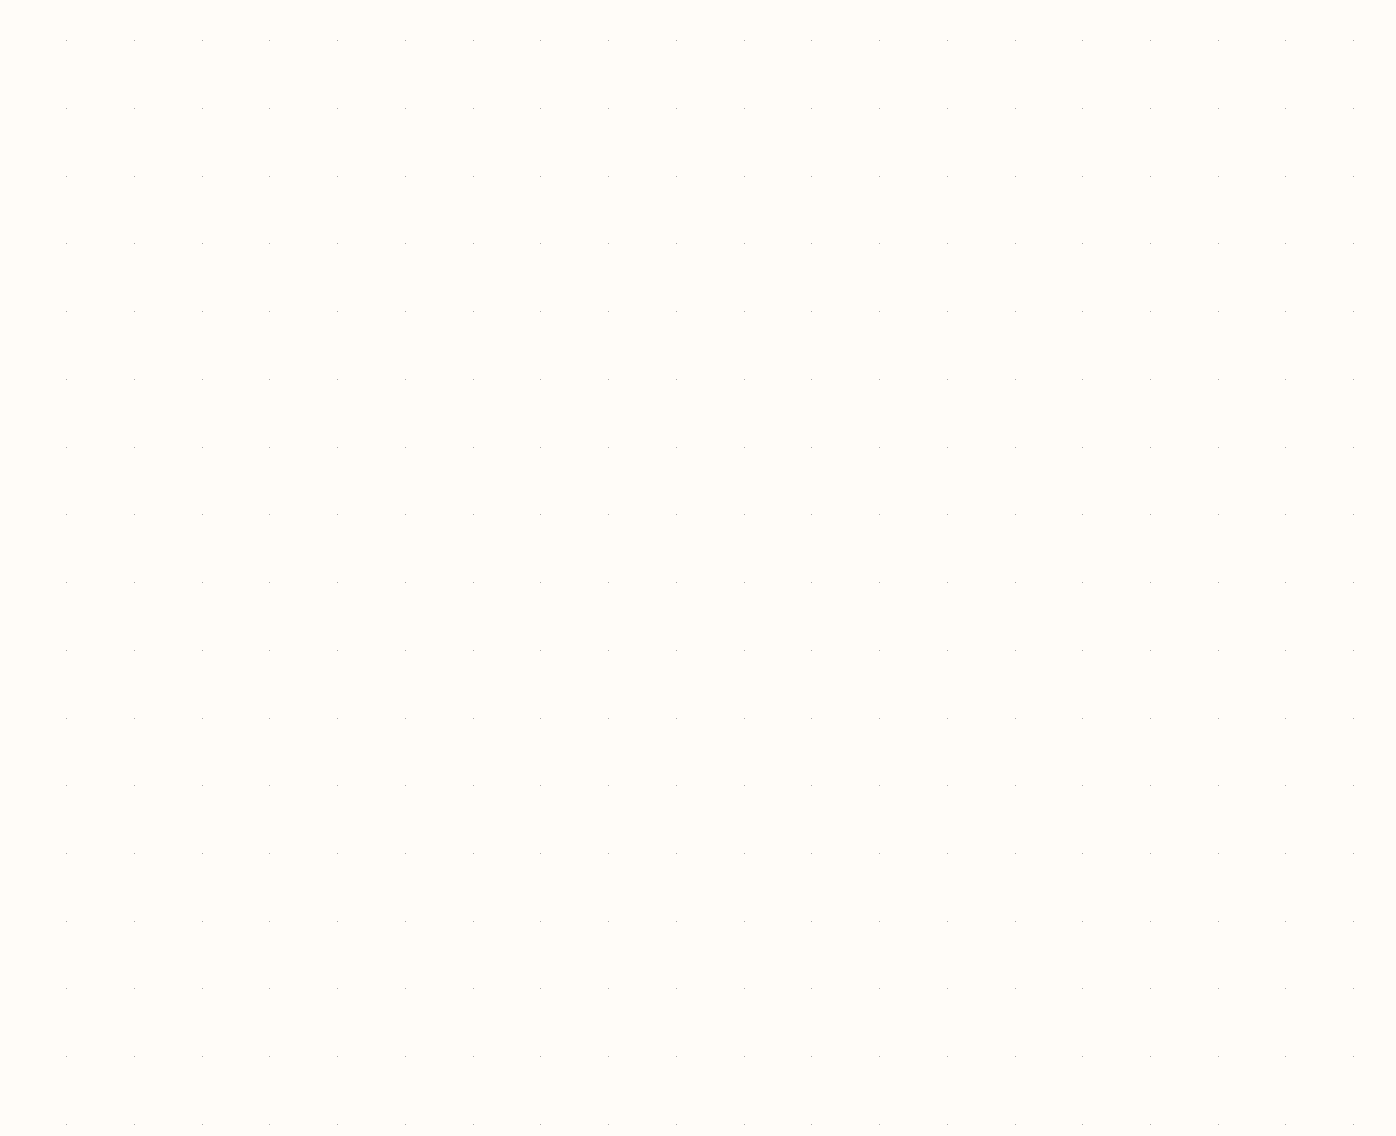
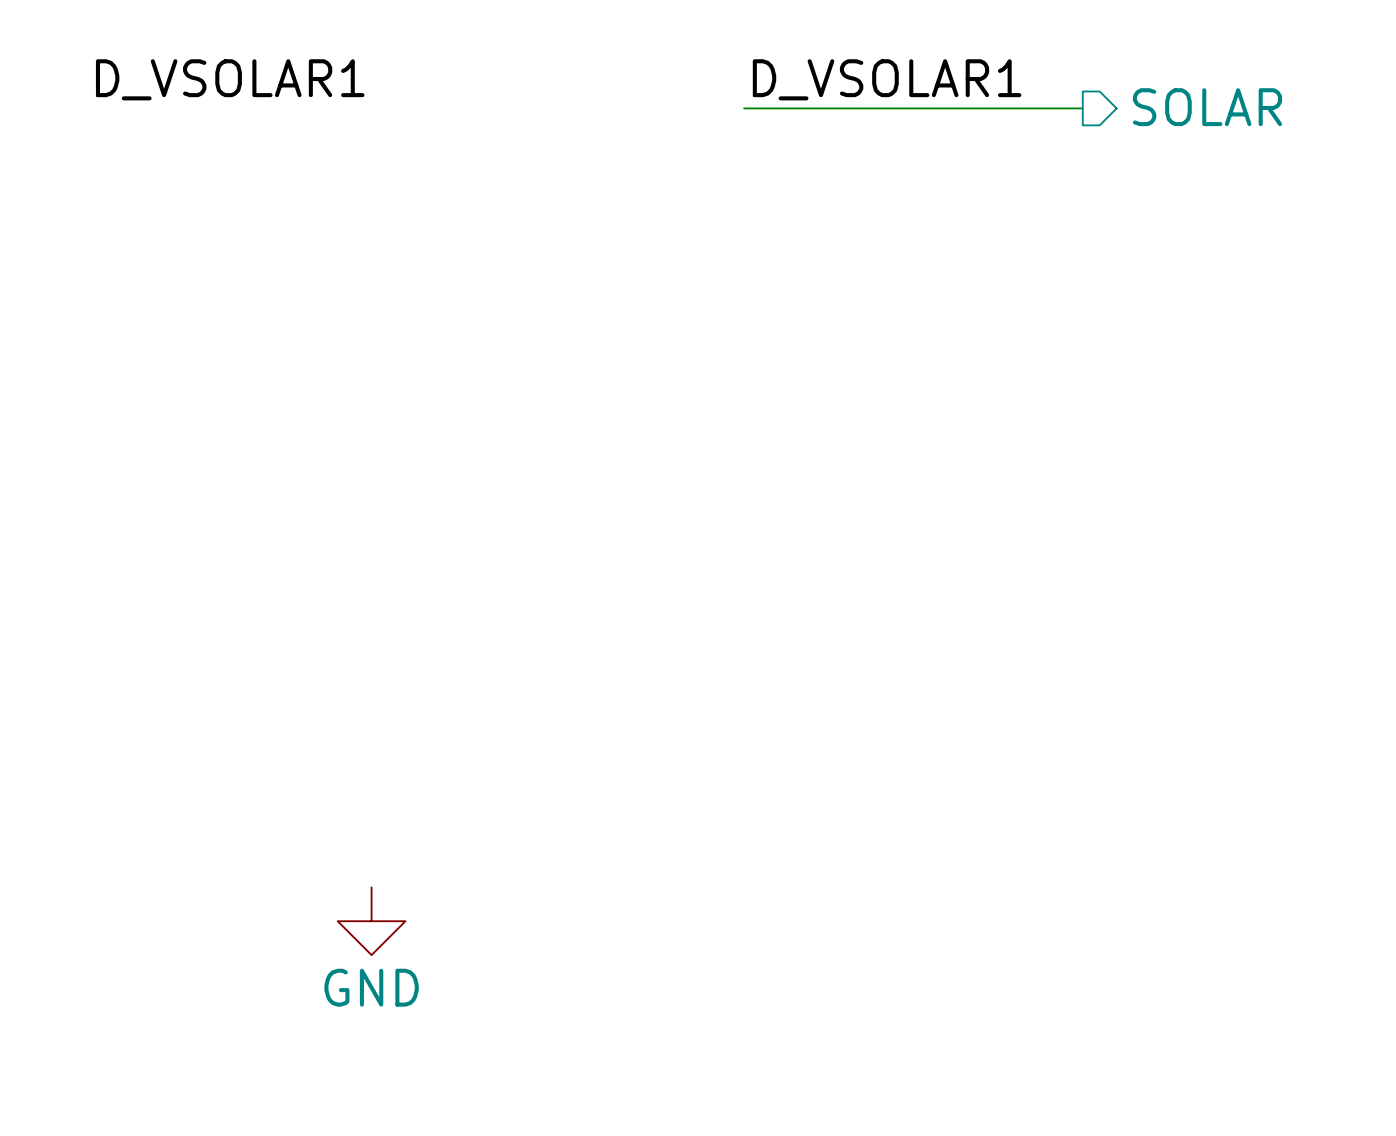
label: none -> D_VSOLAR1 (230, 79)
label: none -> D_VSOLAR1 (887, 79)
sheet pin: none -> SOLAR (1207, 107)
wire: none -> (744, 108) (1082, 108)
power symbol: none -> GND (371, 921)

